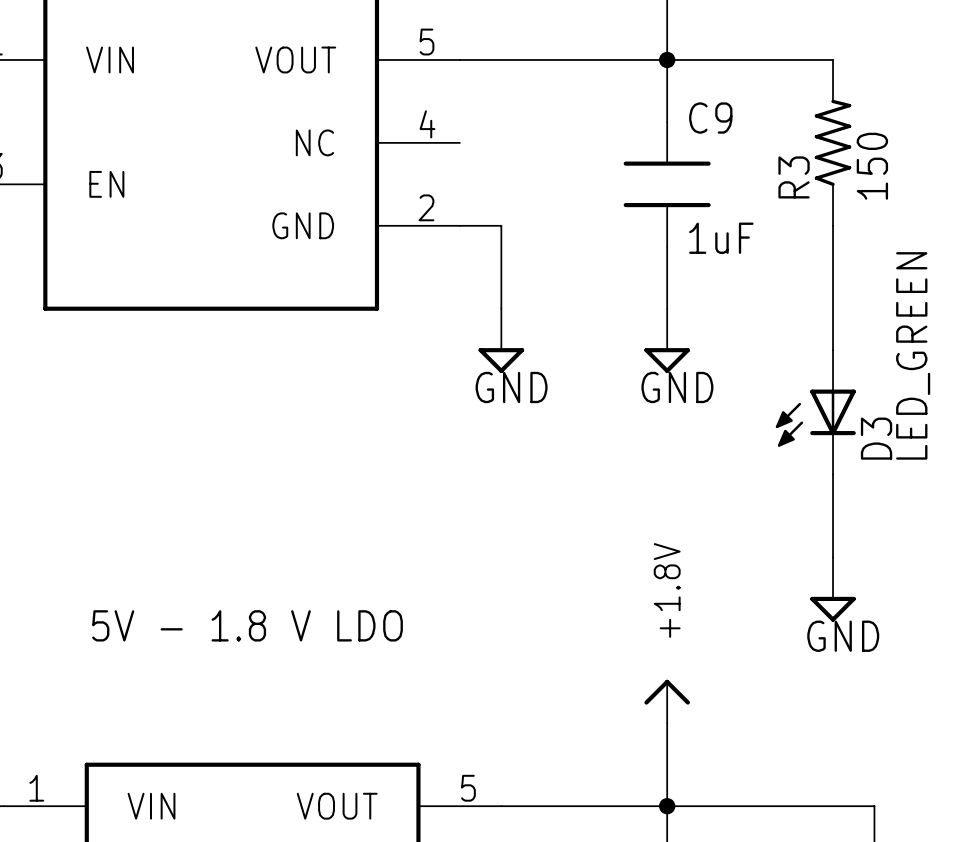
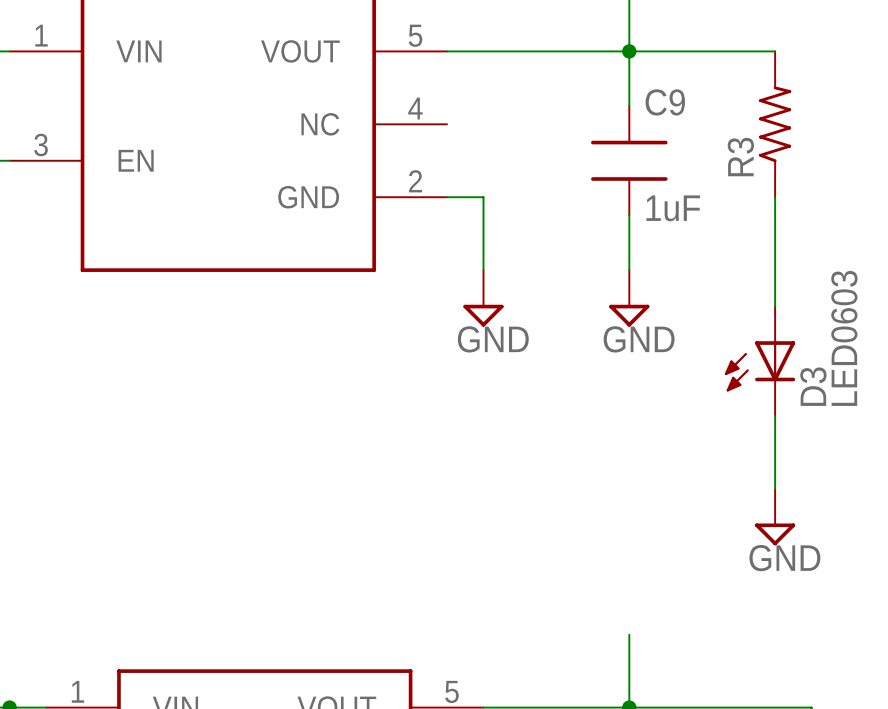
R3 value: 150 (872, 166) -> none
D3 value: LED_GREEN (913, 355) -> LED0603 (844, 338)
text: 5V - 1.8 V LDO (247, 625) -> none
power symbol: (667, 701) -> none

